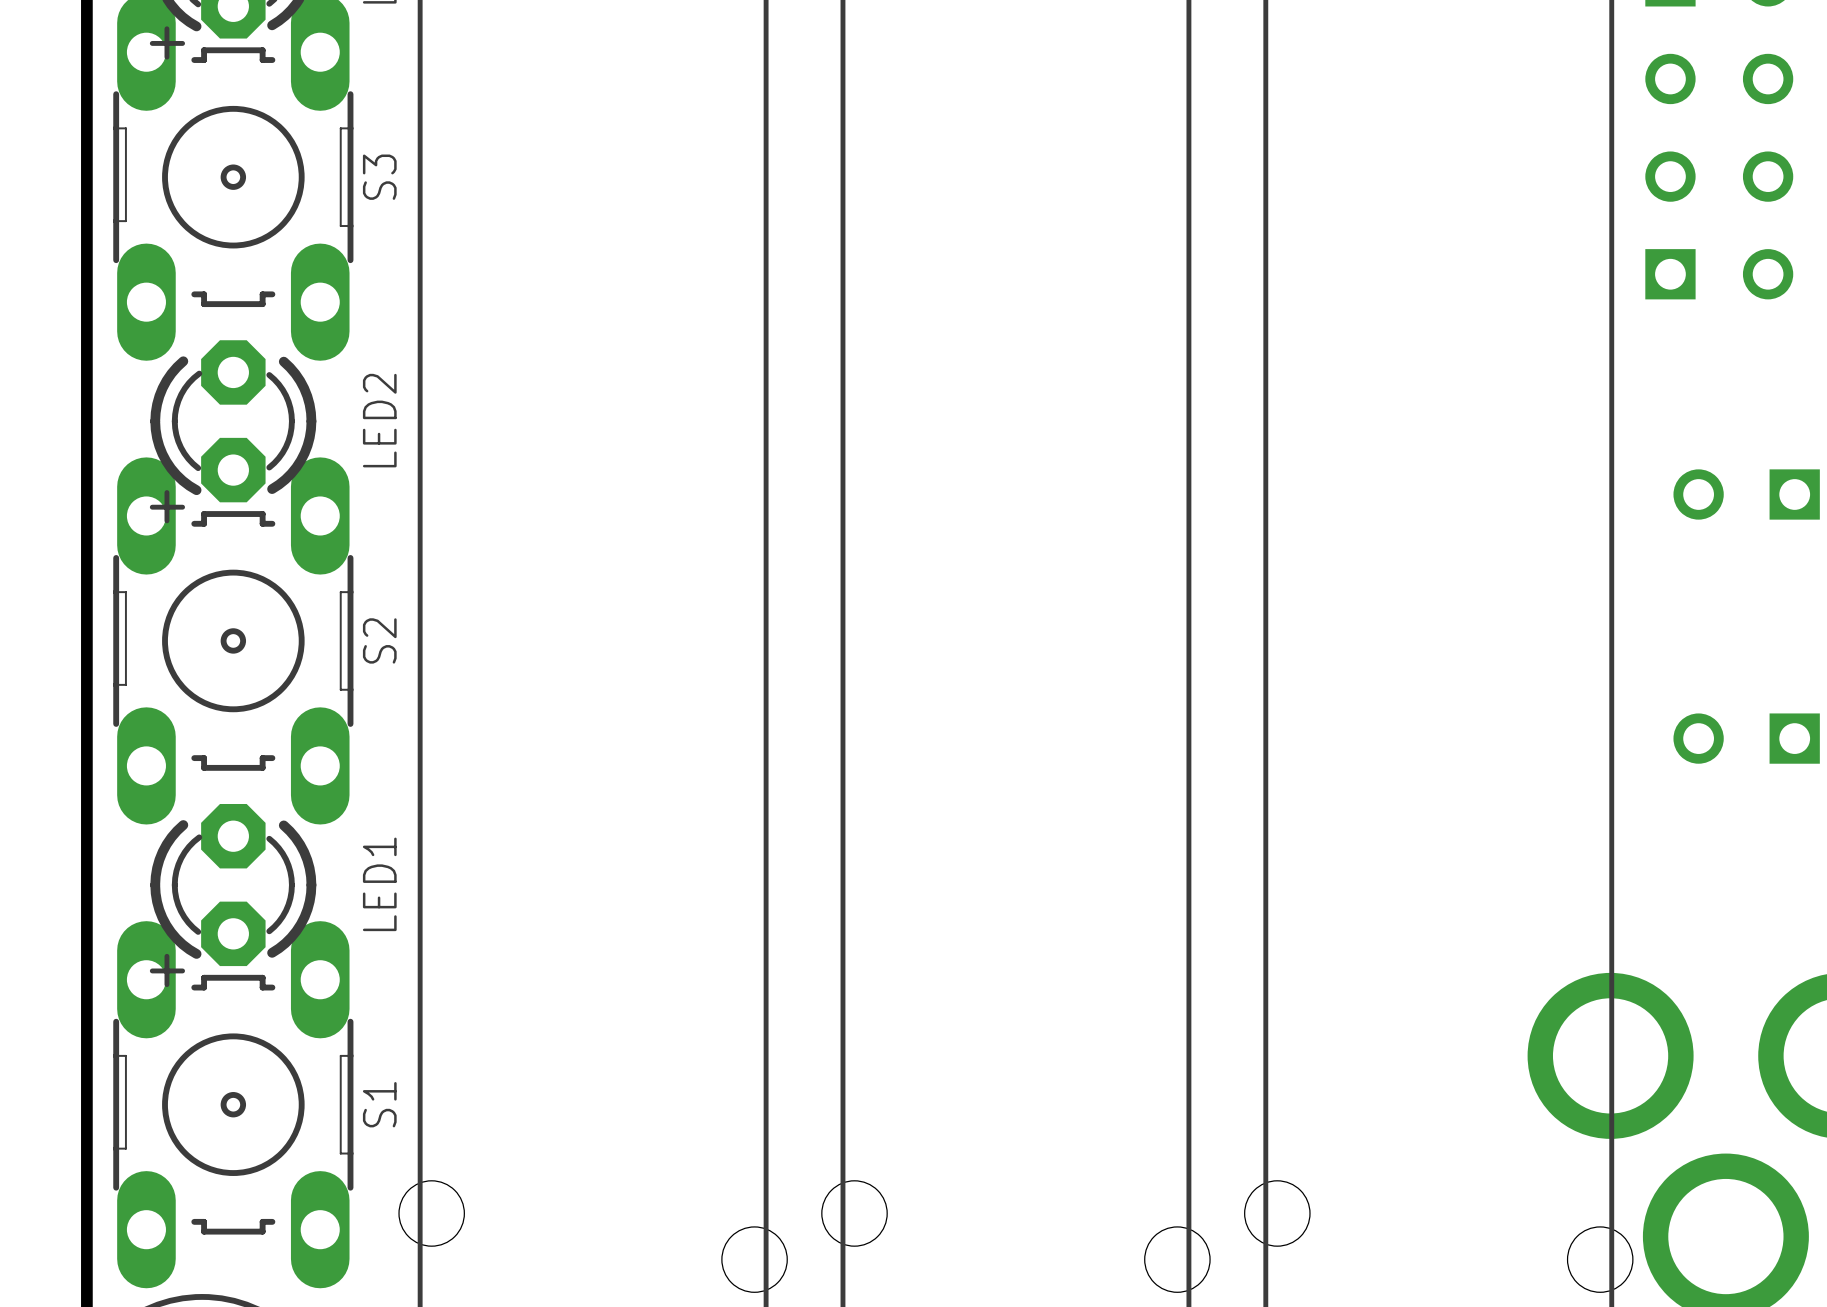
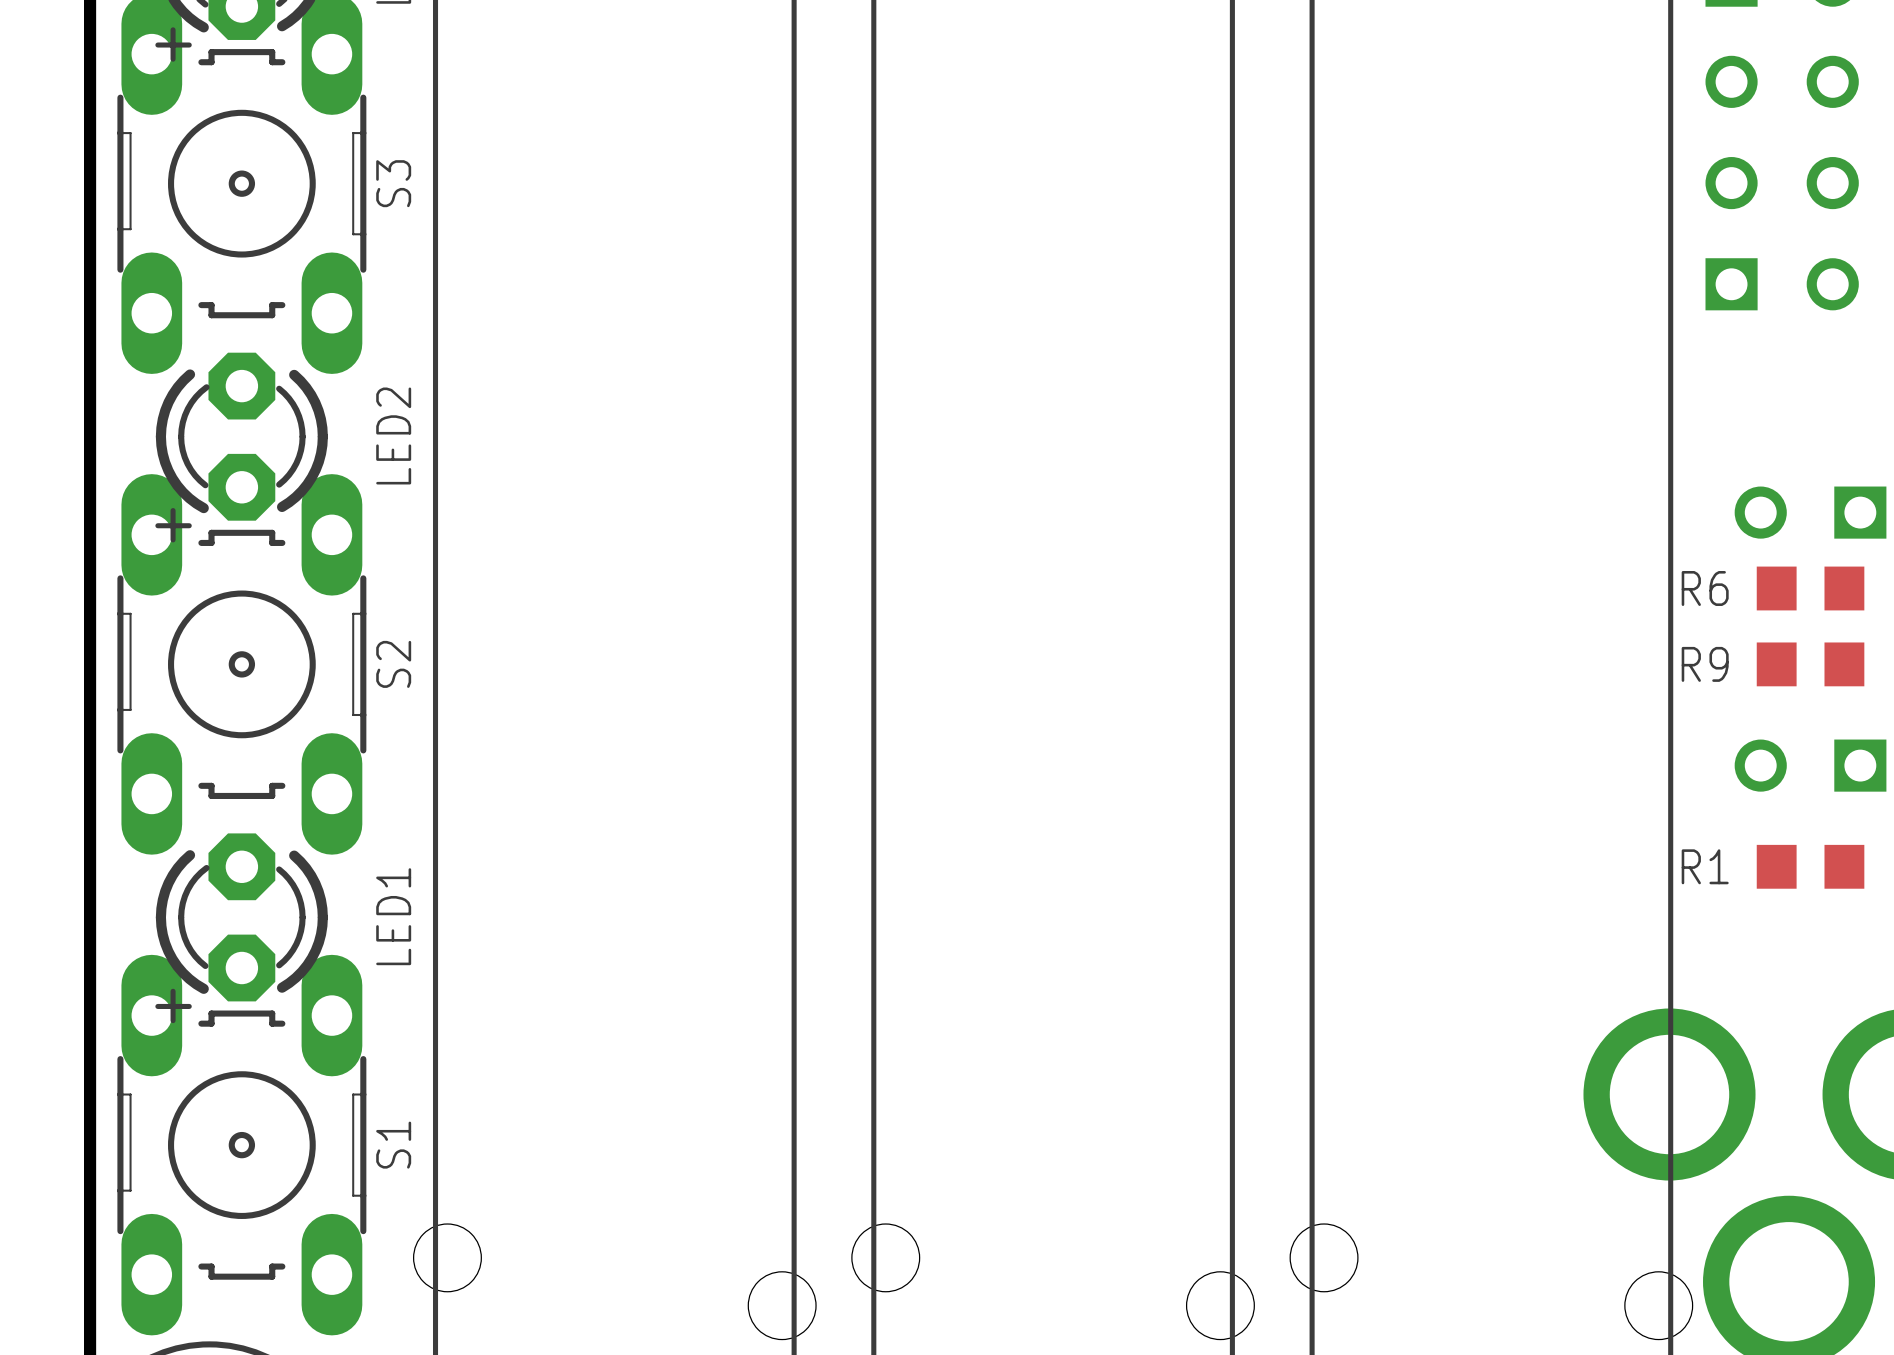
R6: none -> (1810, 588)
R9: none -> (1810, 664)
R1: none -> (1810, 866)

